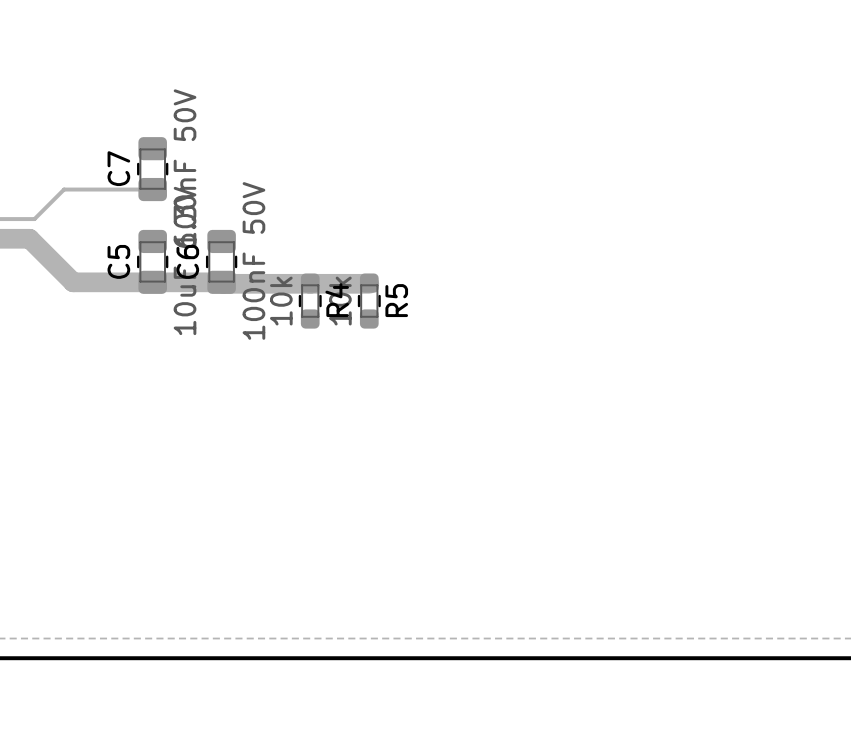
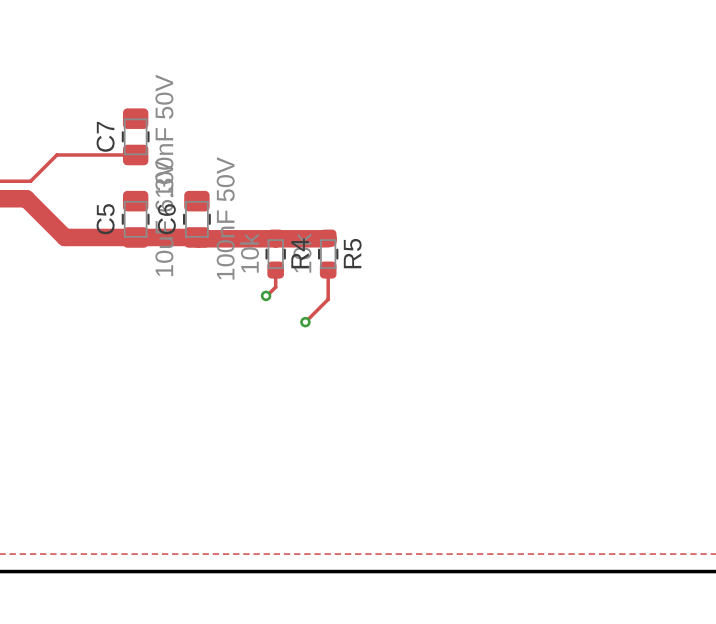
track: none -> (275, 270) (275, 287) (266, 295)
track: none -> (328, 270) (328, 299) (305, 322)
via: none -> (266, 295)
via: none -> (305, 322)

